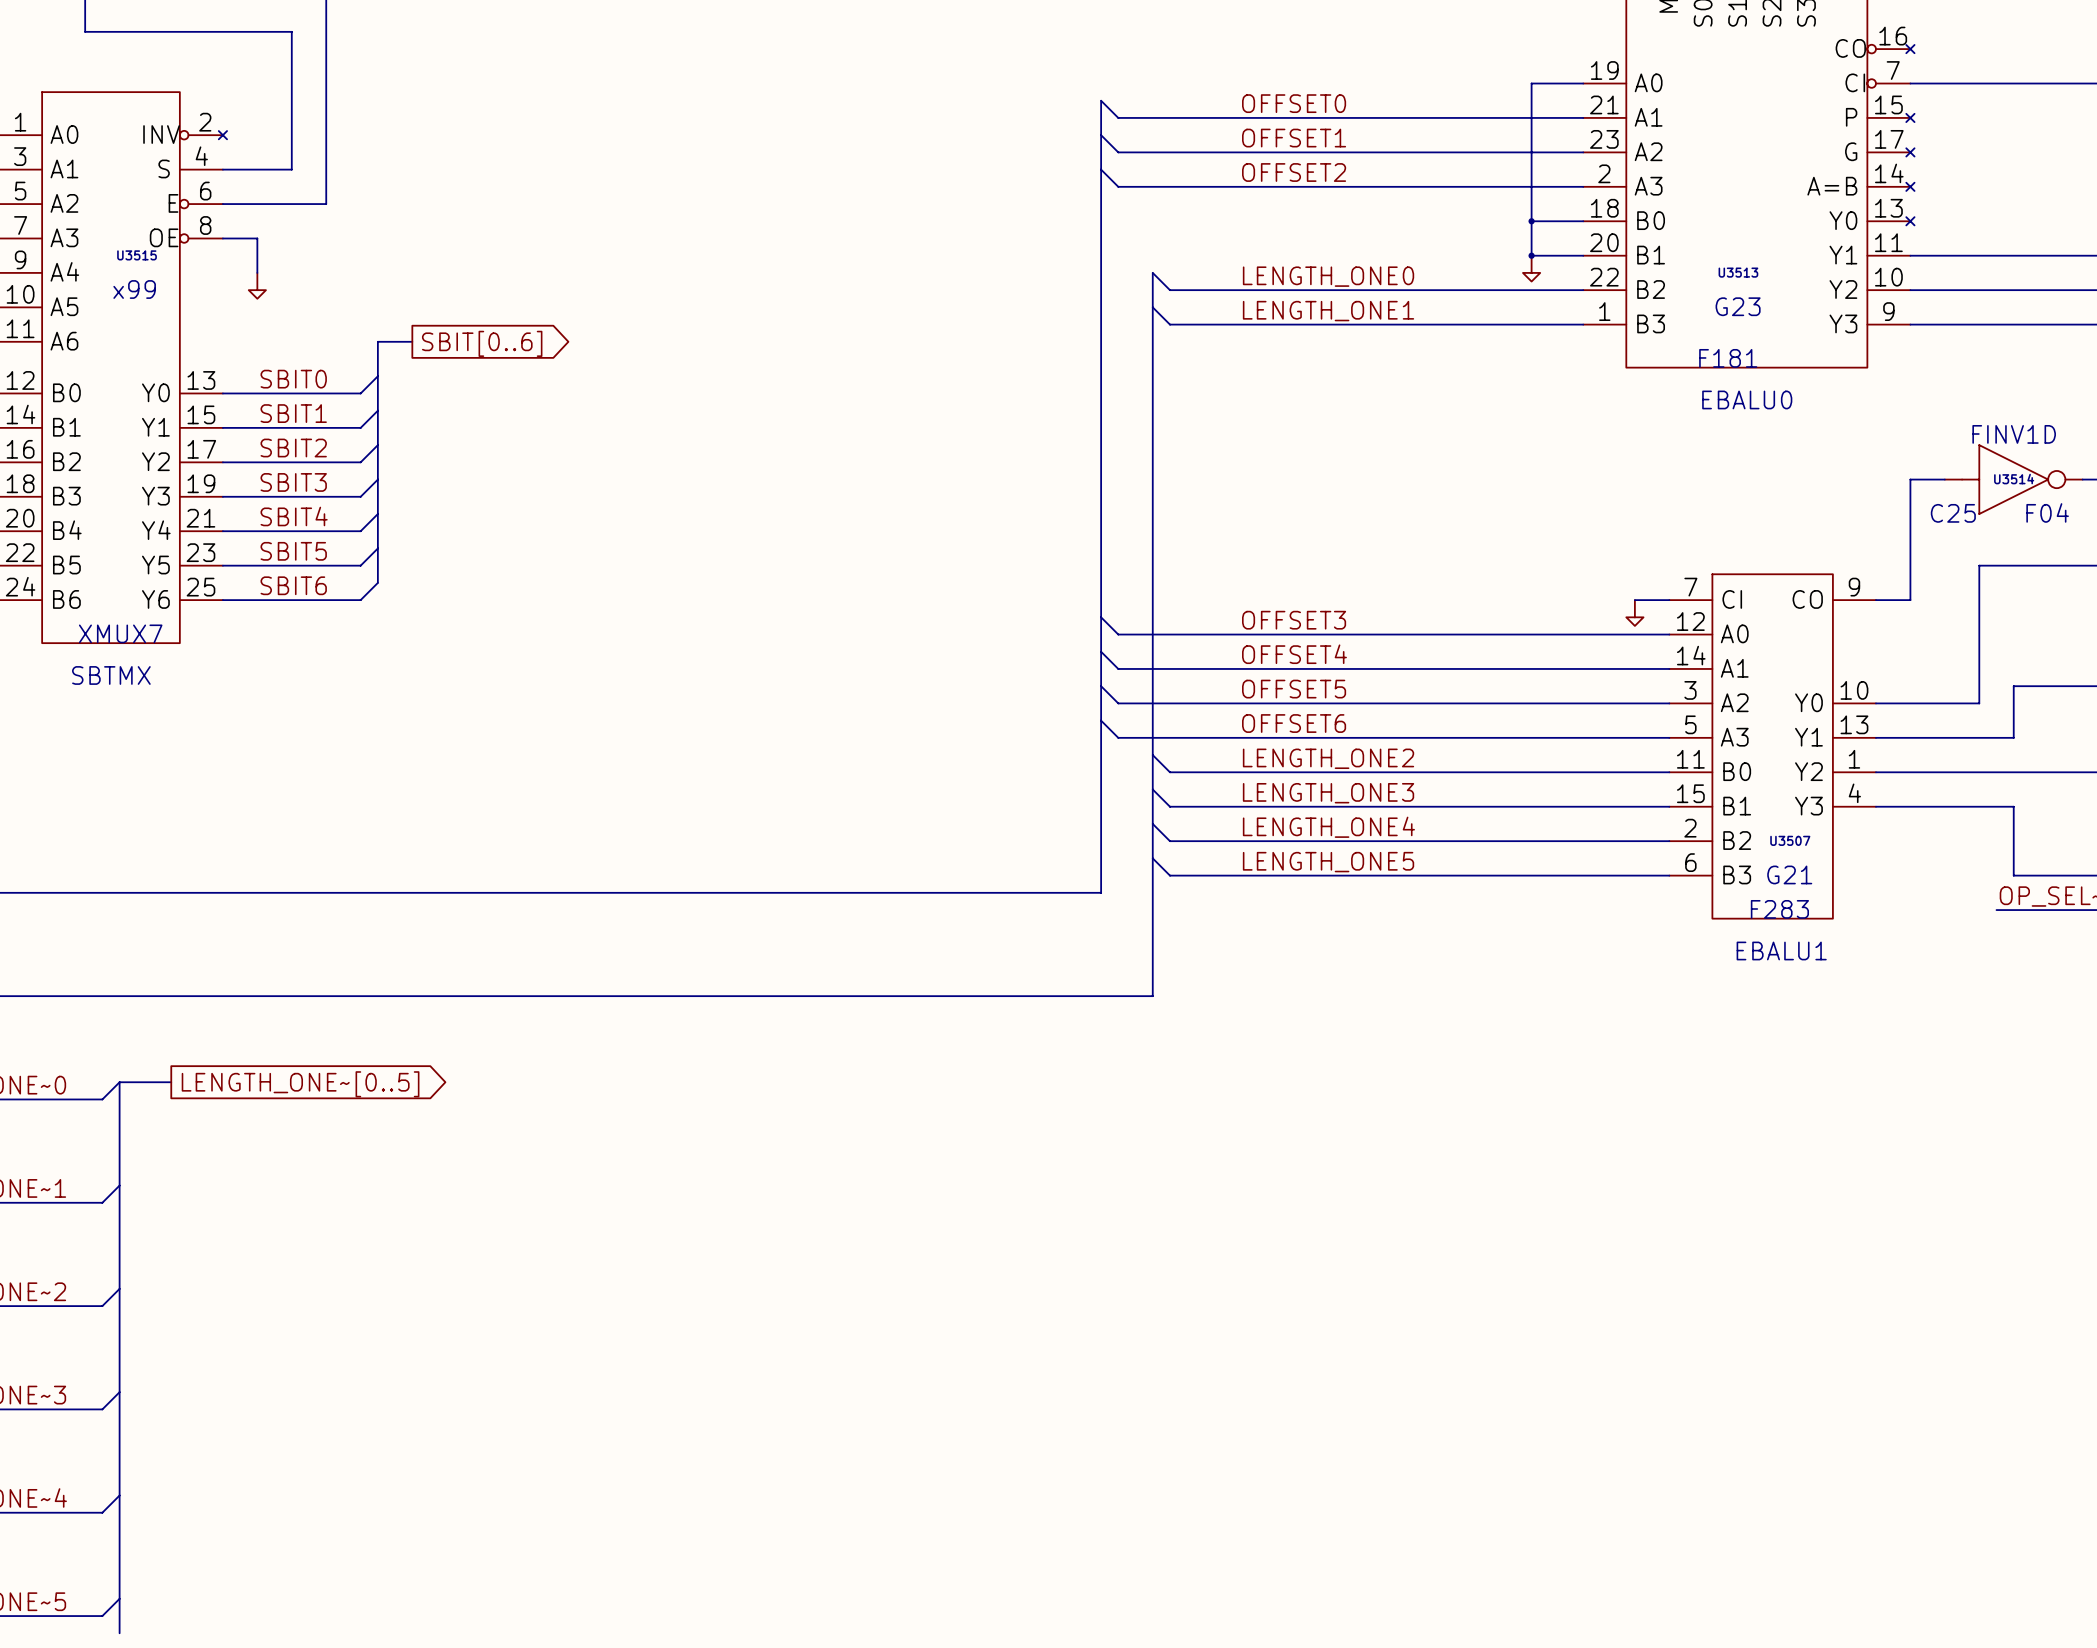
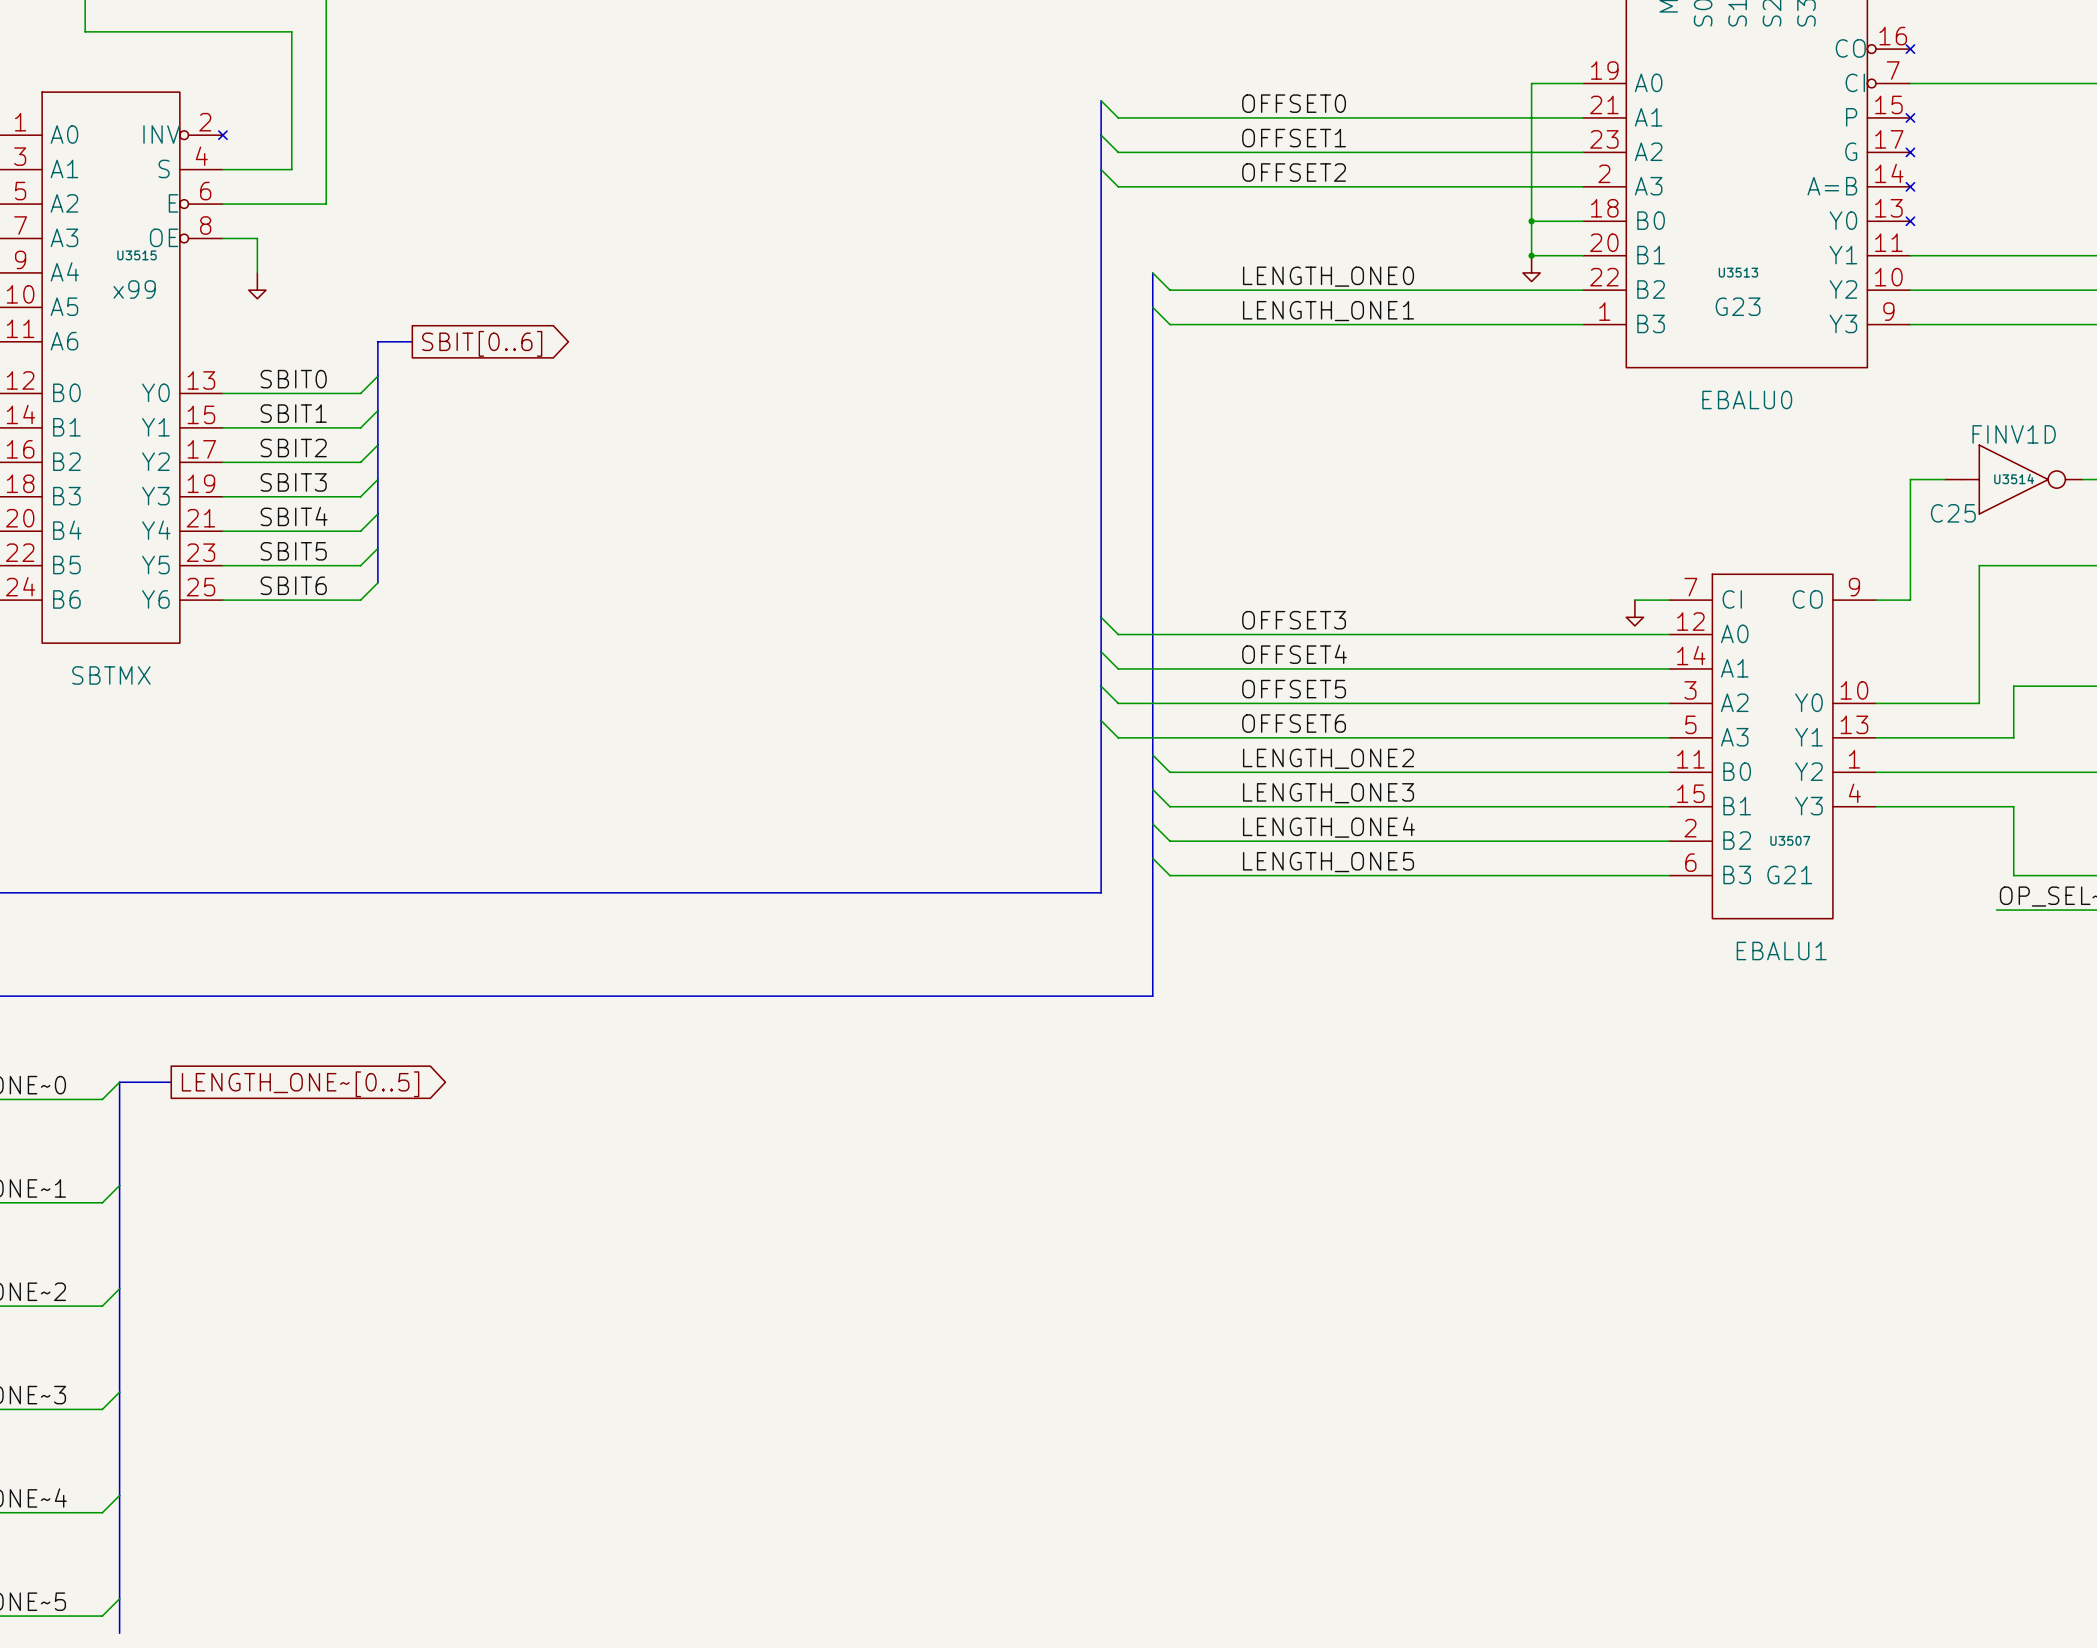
U3513 value: F181 (1728, 358) -> none
U3514 value: F04 (2047, 512) -> none
U3515 value: XMUX7 (120, 633) -> none
U3507 value: F283 (1779, 909) -> none

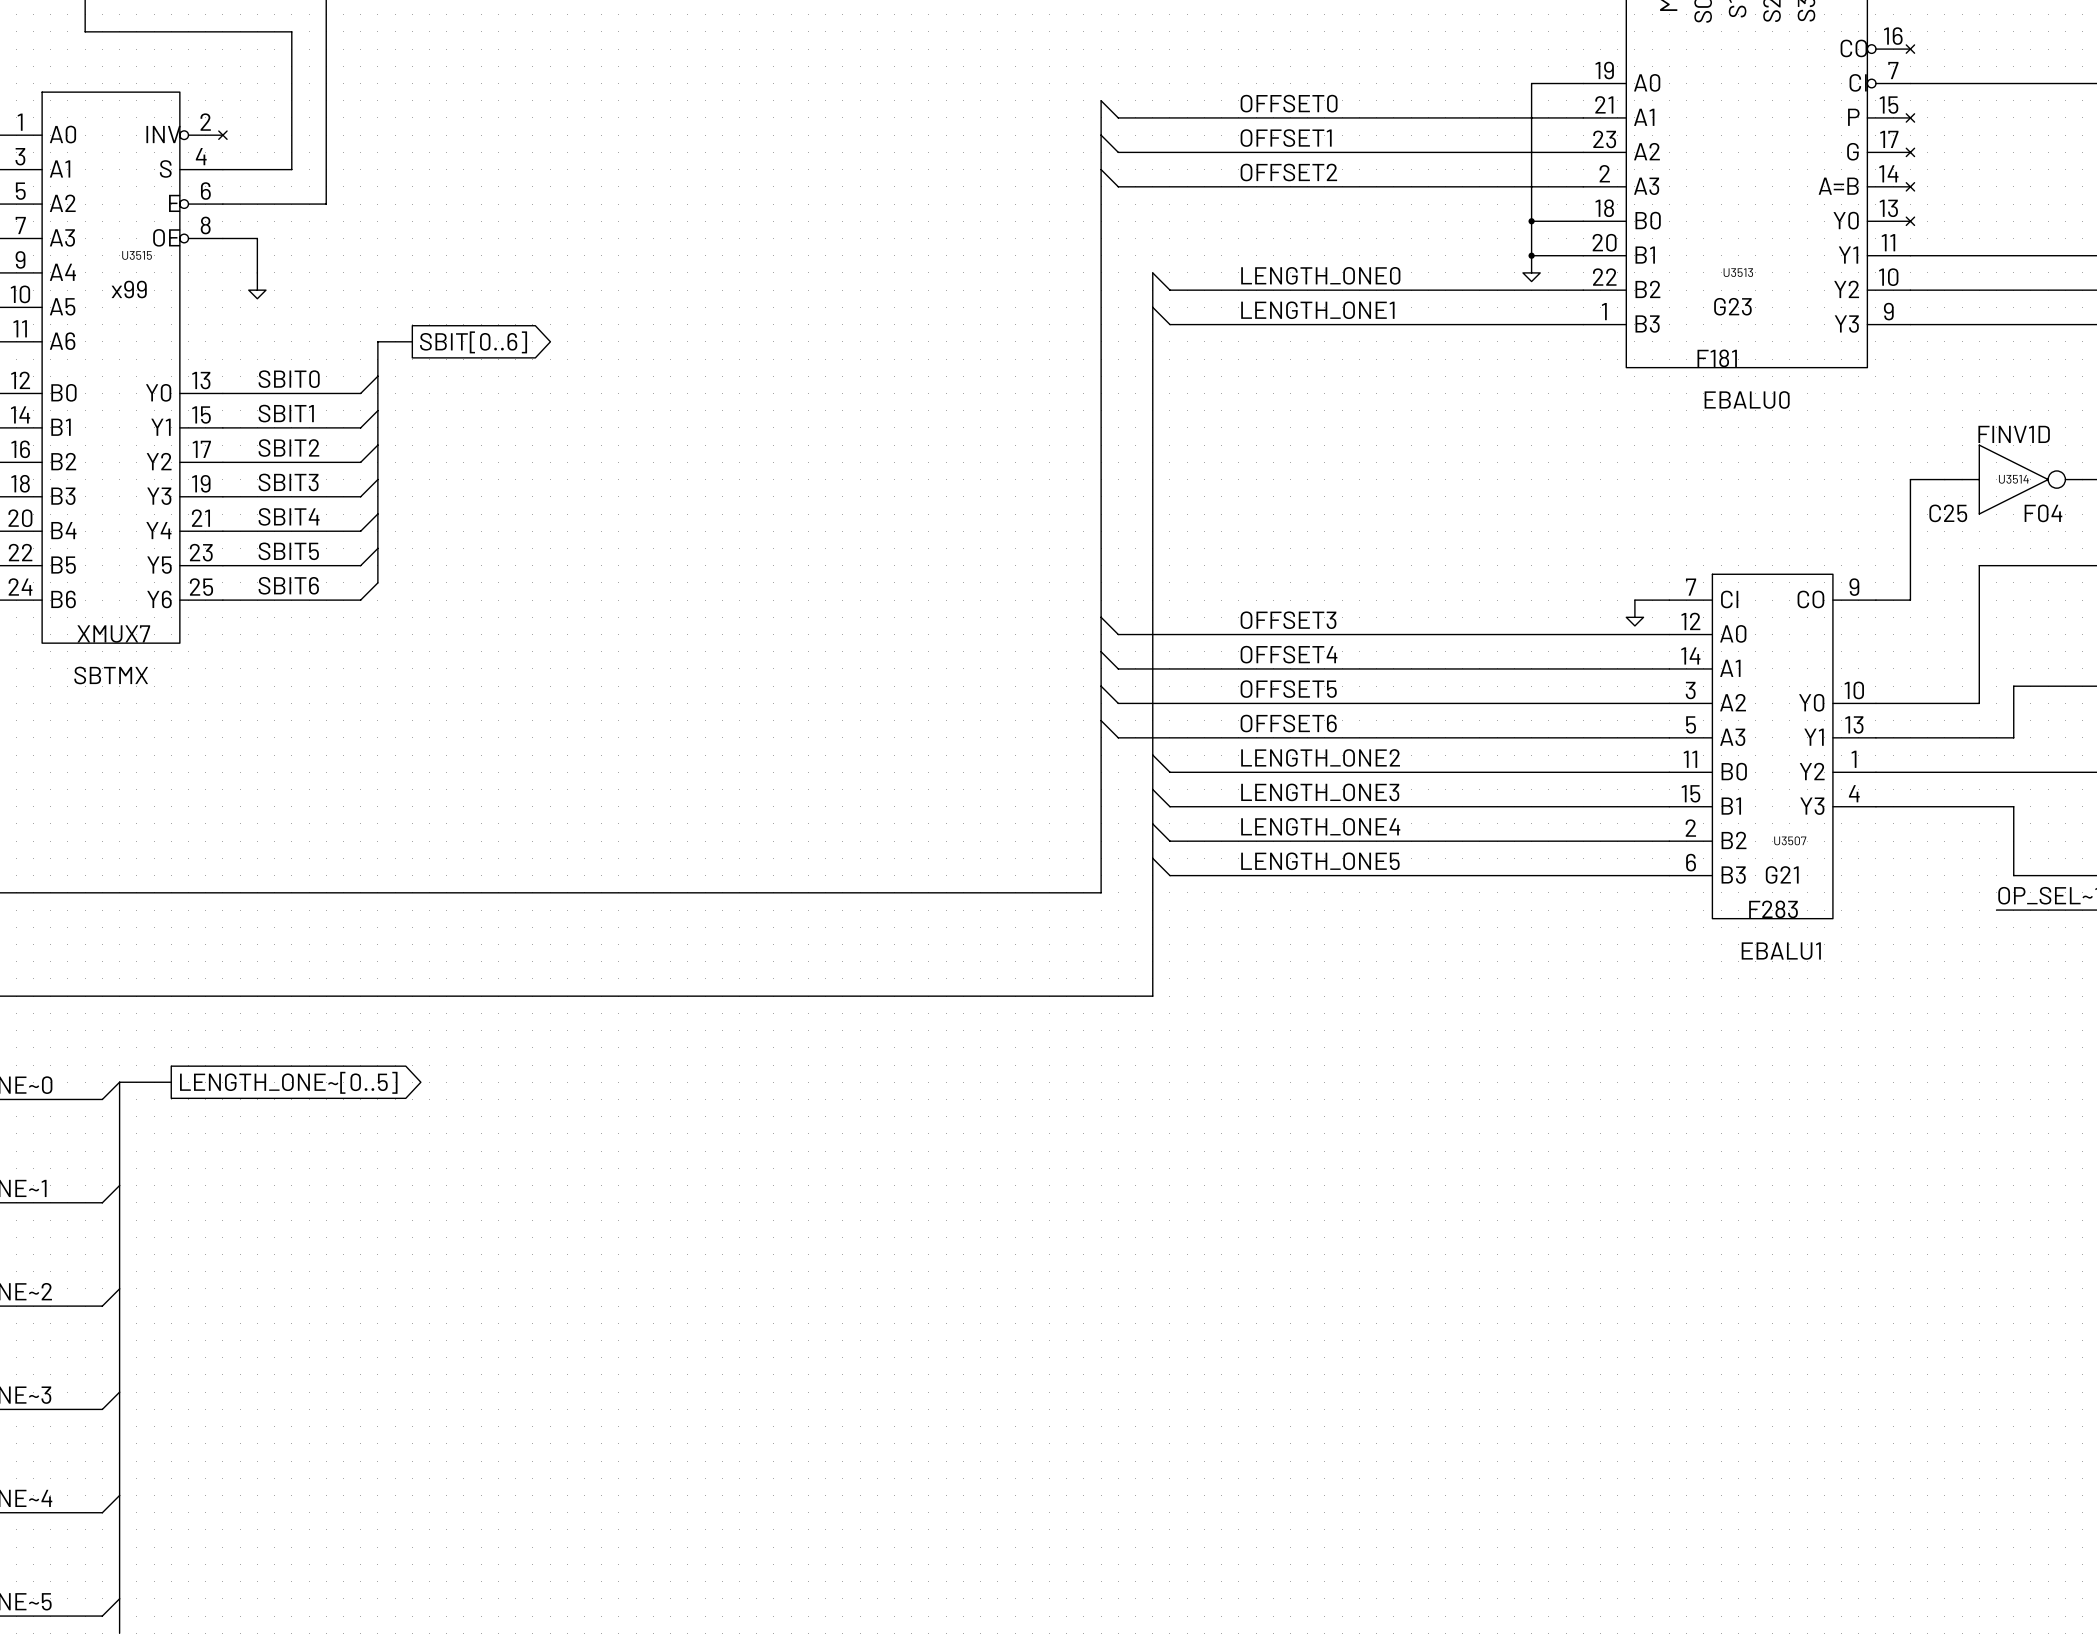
U3513 value: none -> F181 (1717, 358)
U3514 value: none -> F04 (2043, 513)
U3515 value: none -> XMUX7 (113, 633)
U3507 value: none -> F283 (1773, 909)

